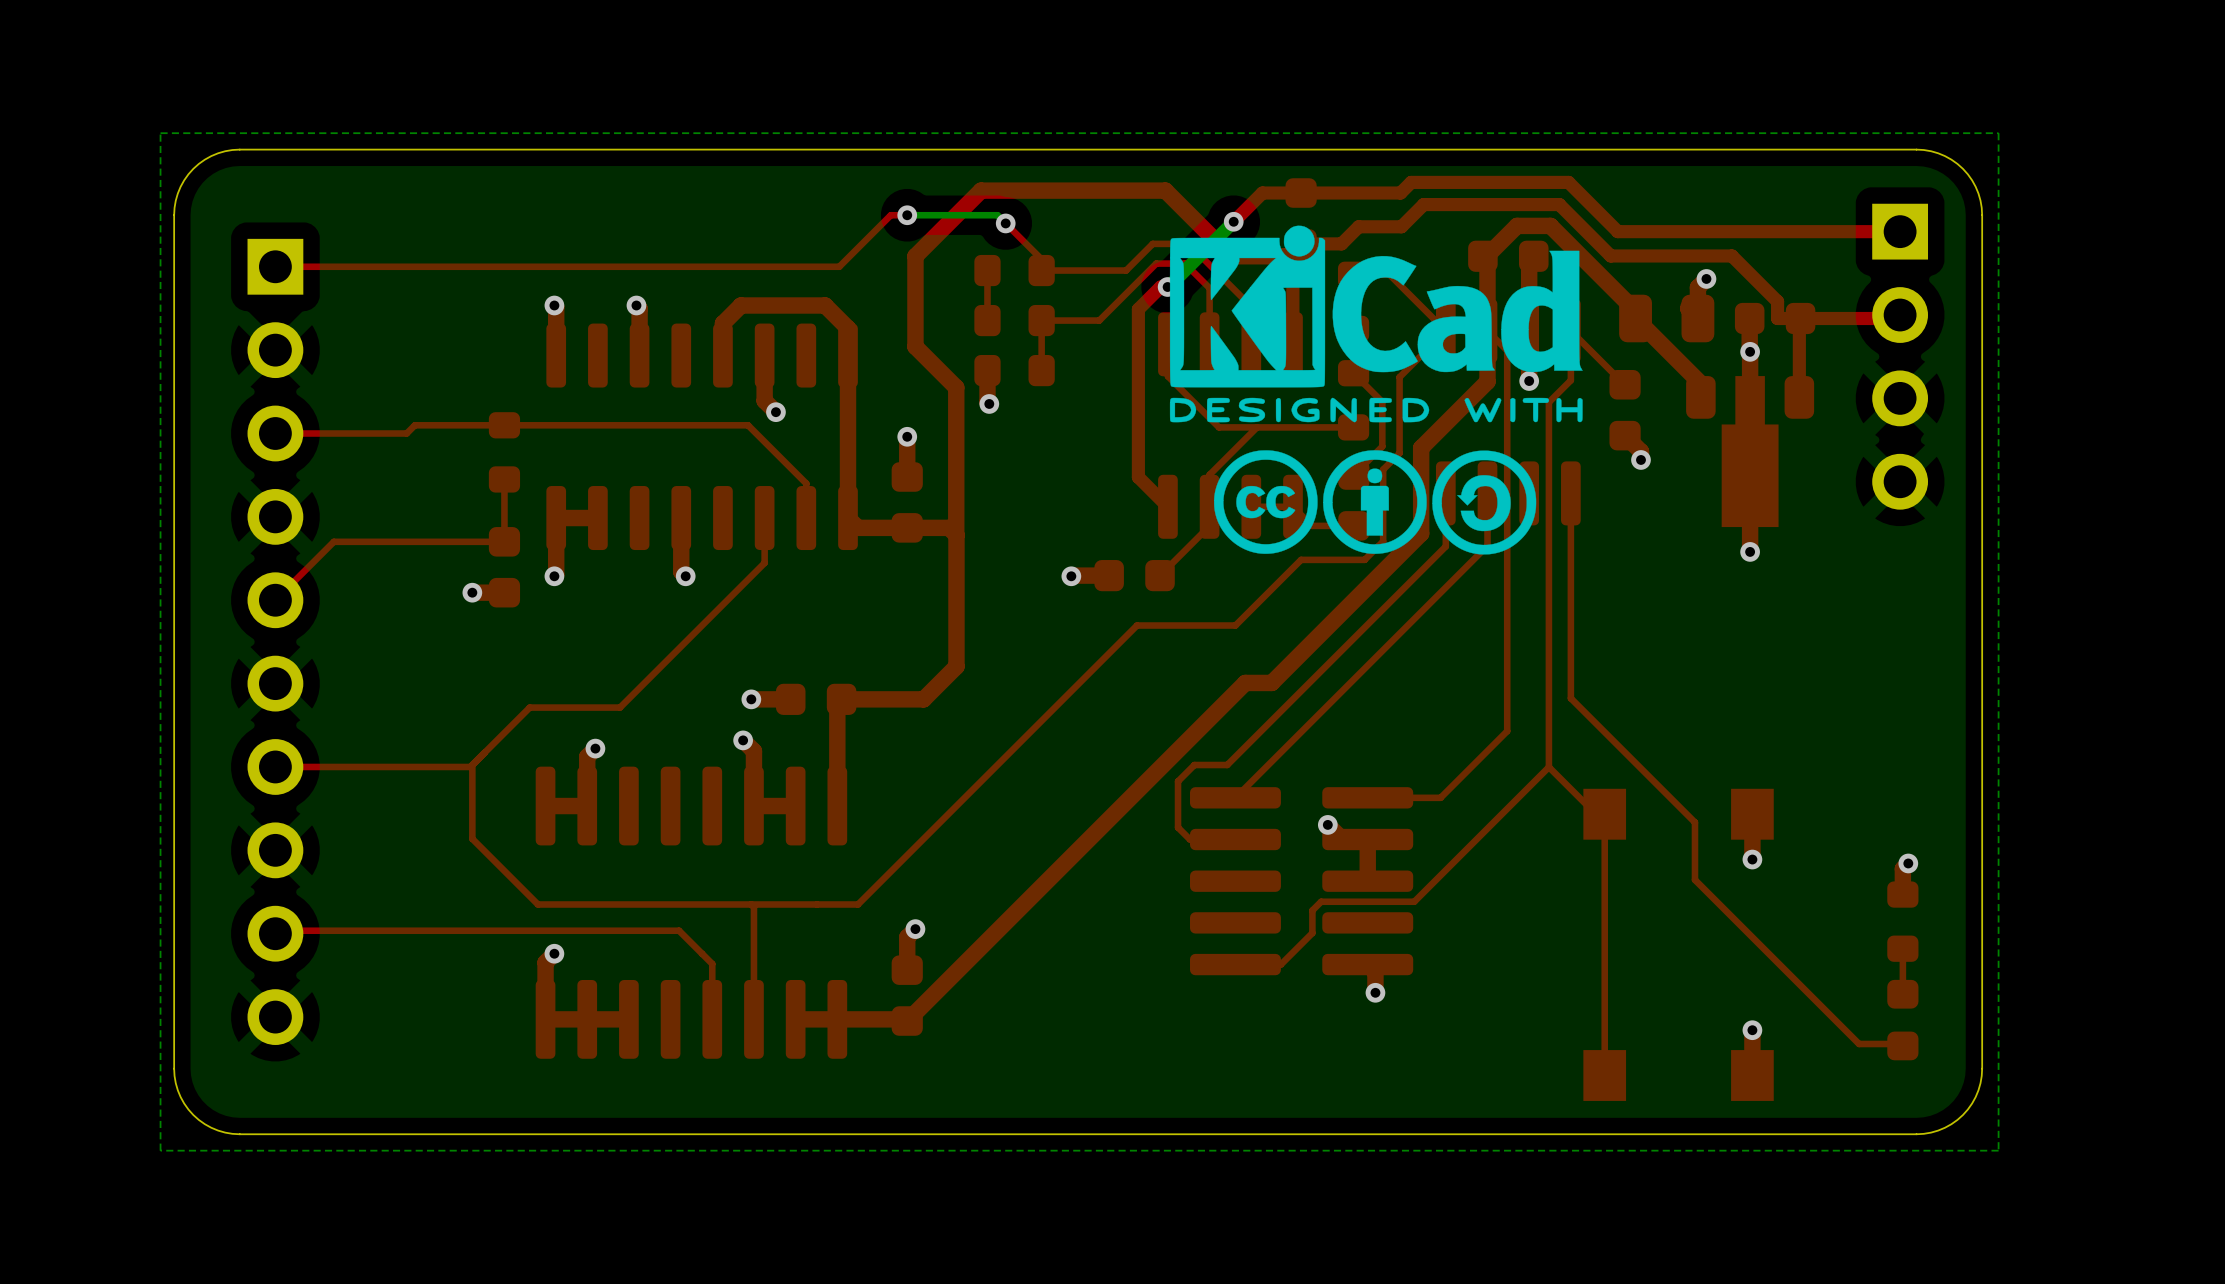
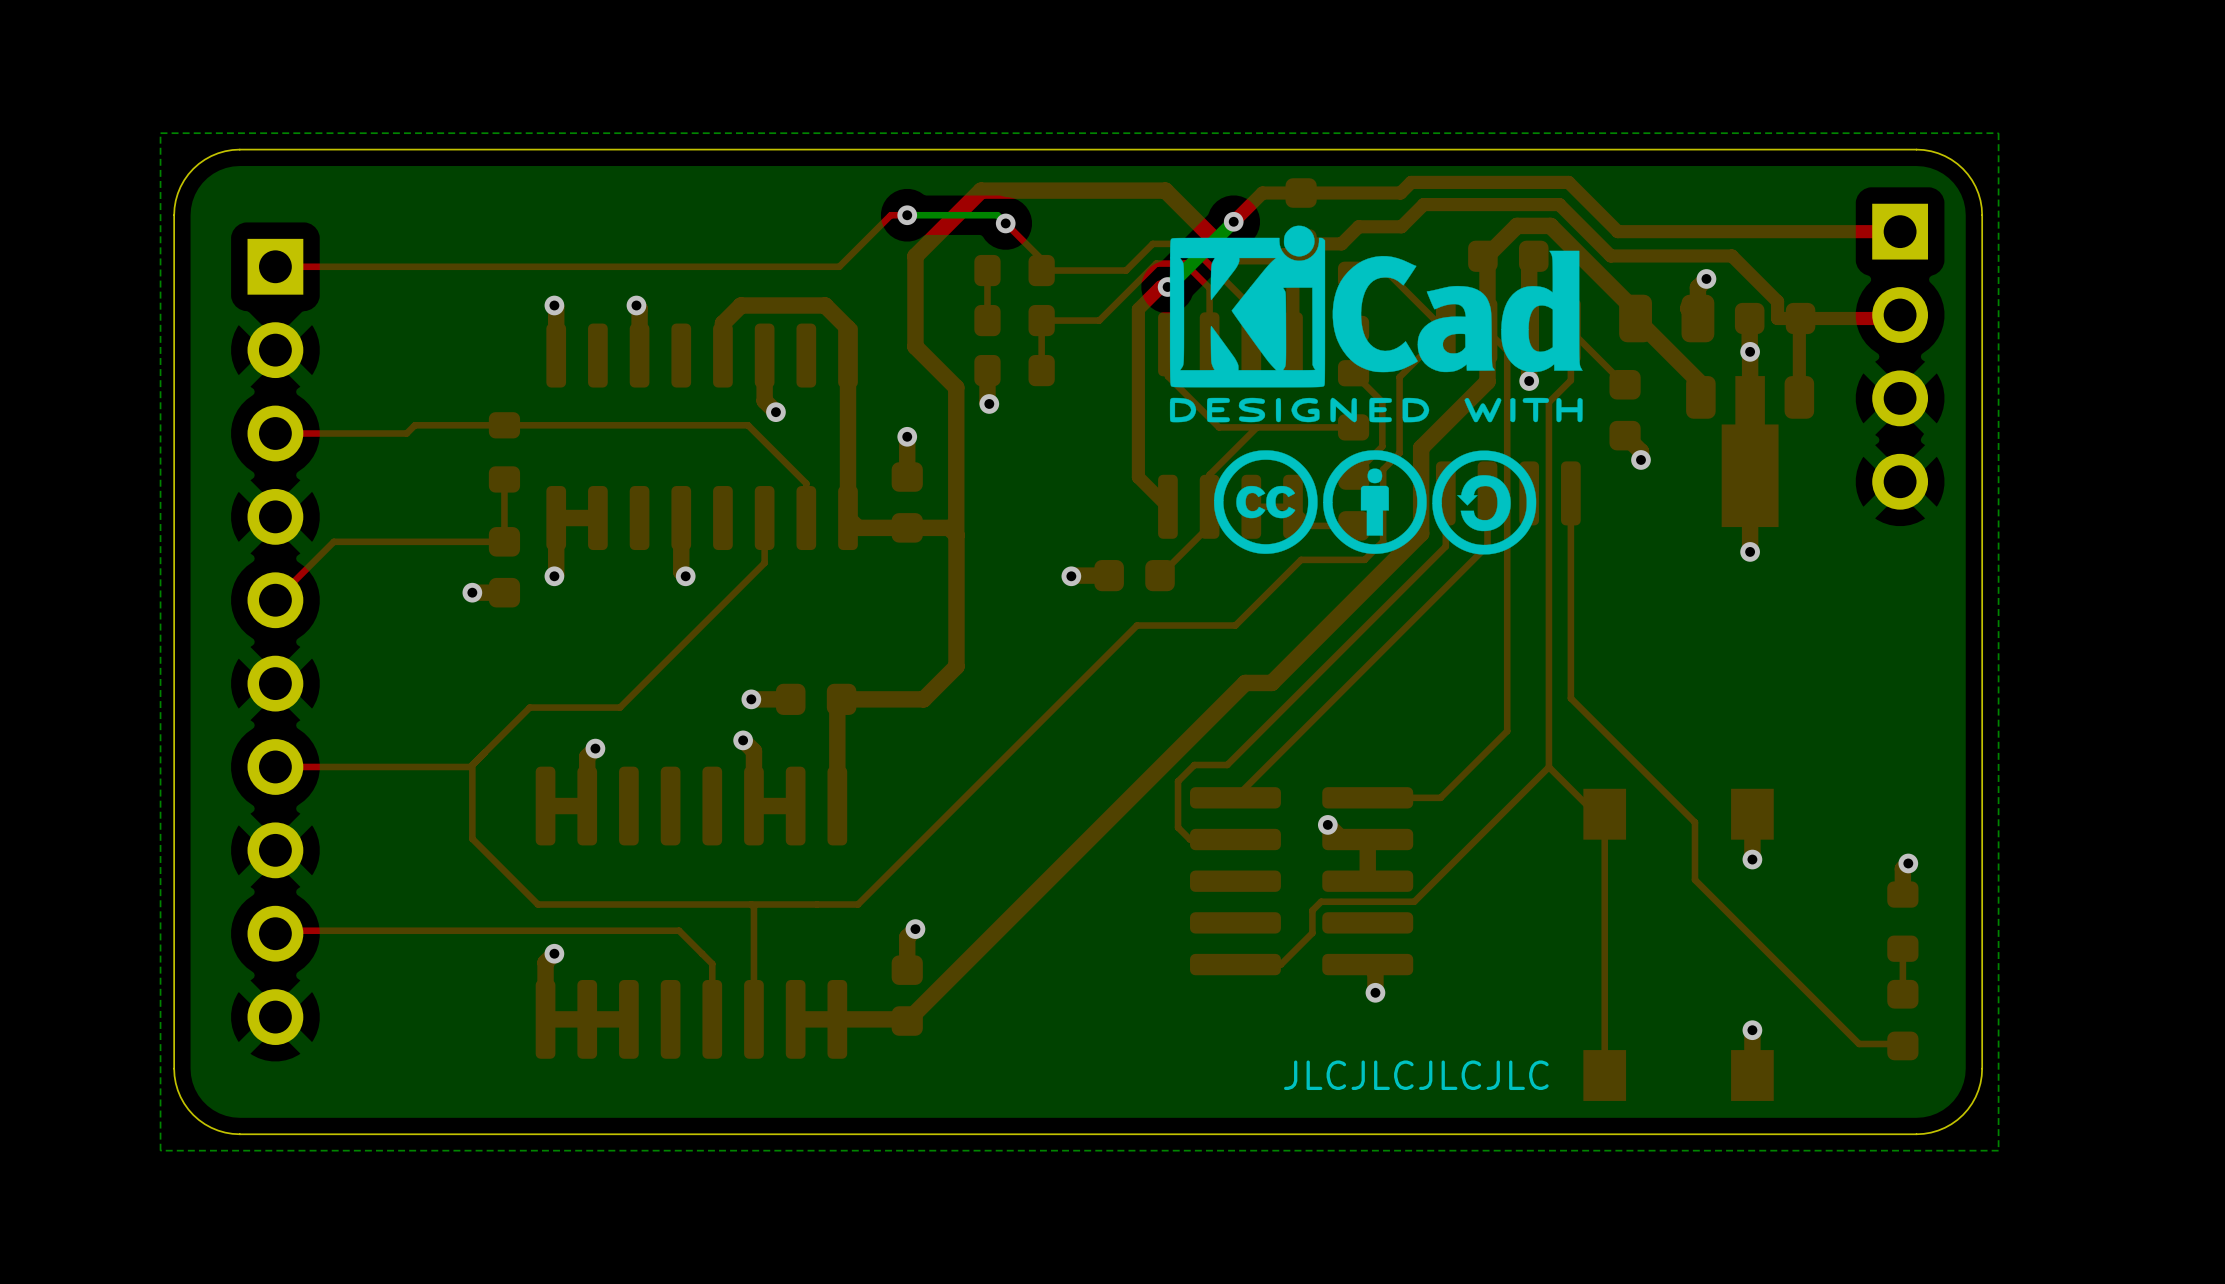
text: none -> JLCJLCJLCJLC (1416, 1075)

